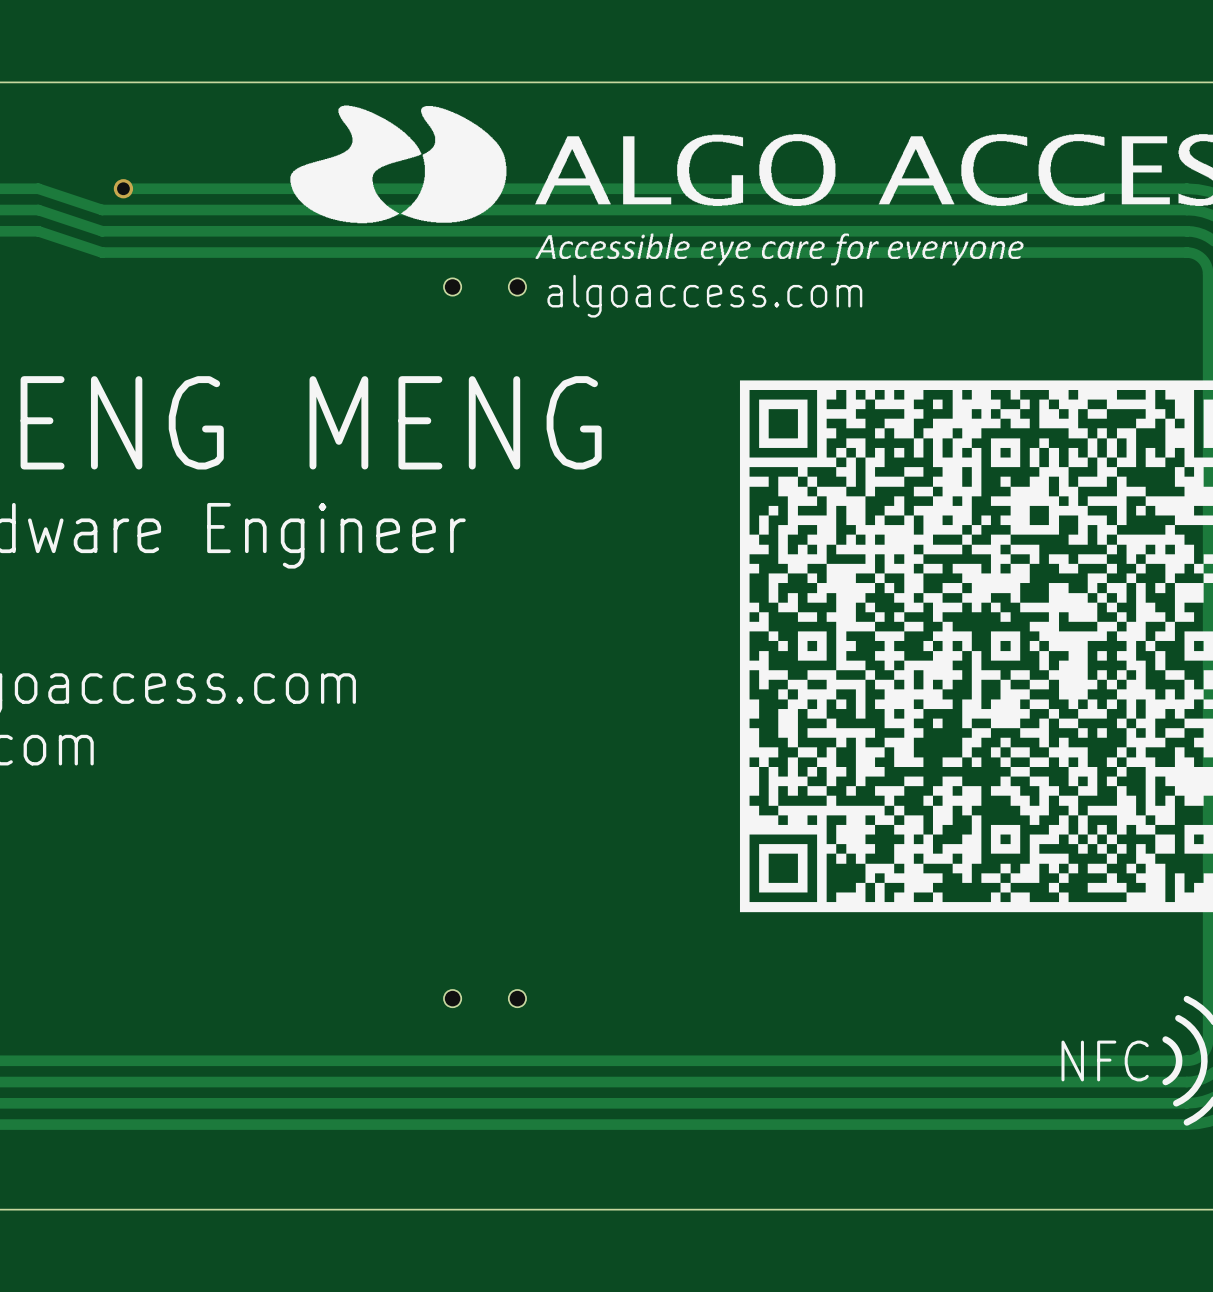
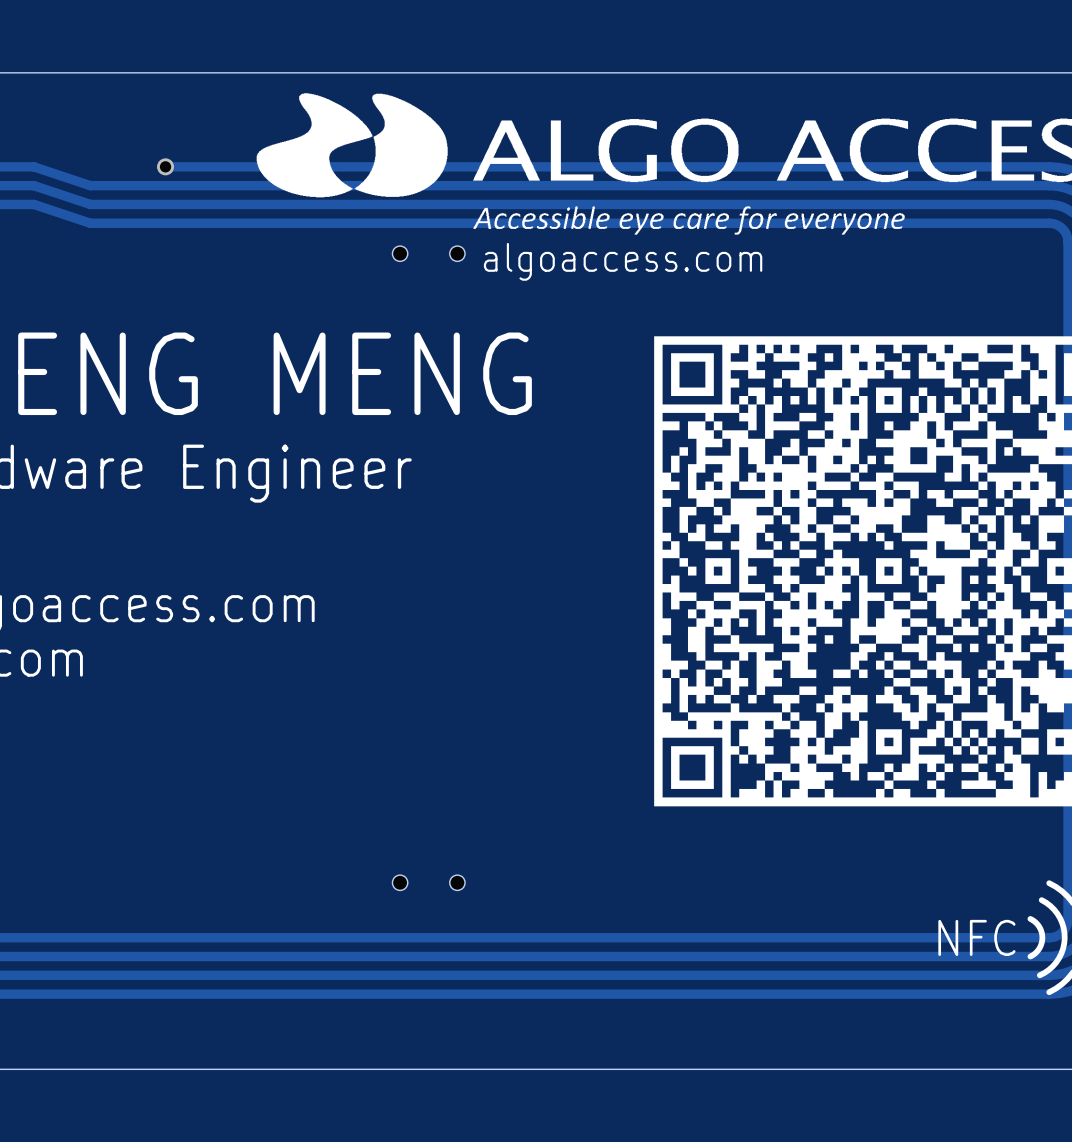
track: (123, 188) (187, 188) -> none
via position: (123, 188) -> (165, 166)

